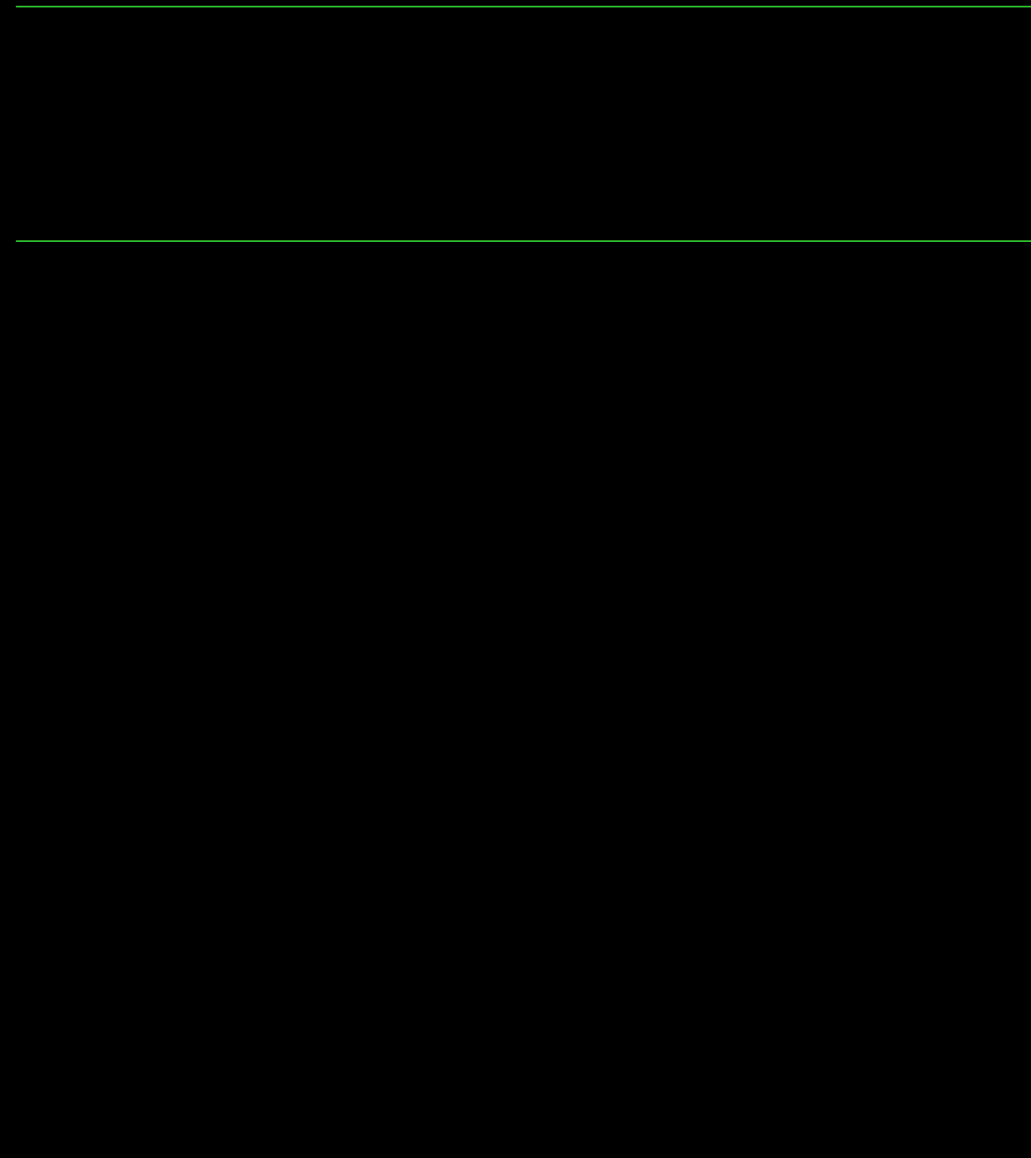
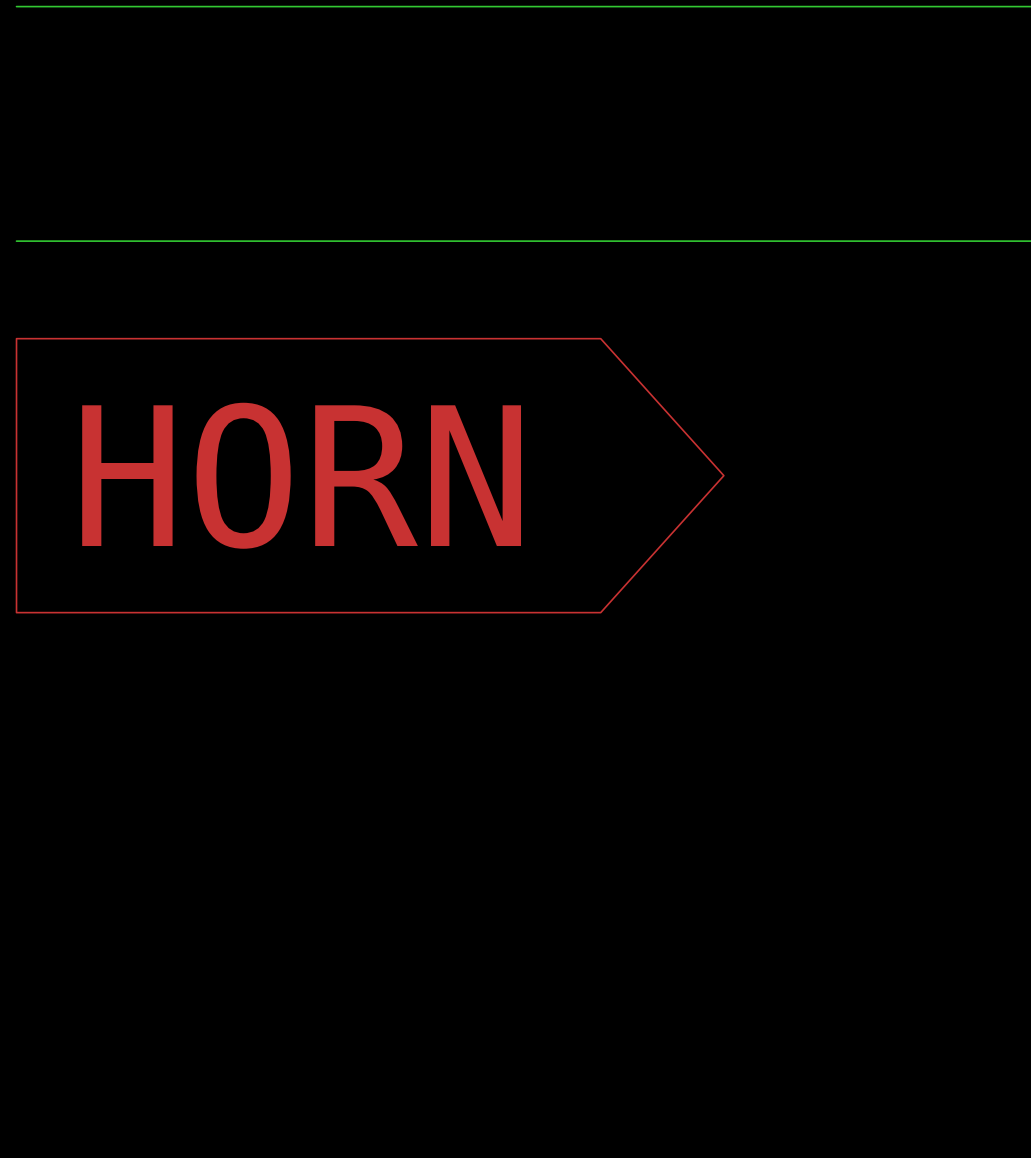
global label: none -> HORN (301, 475)

